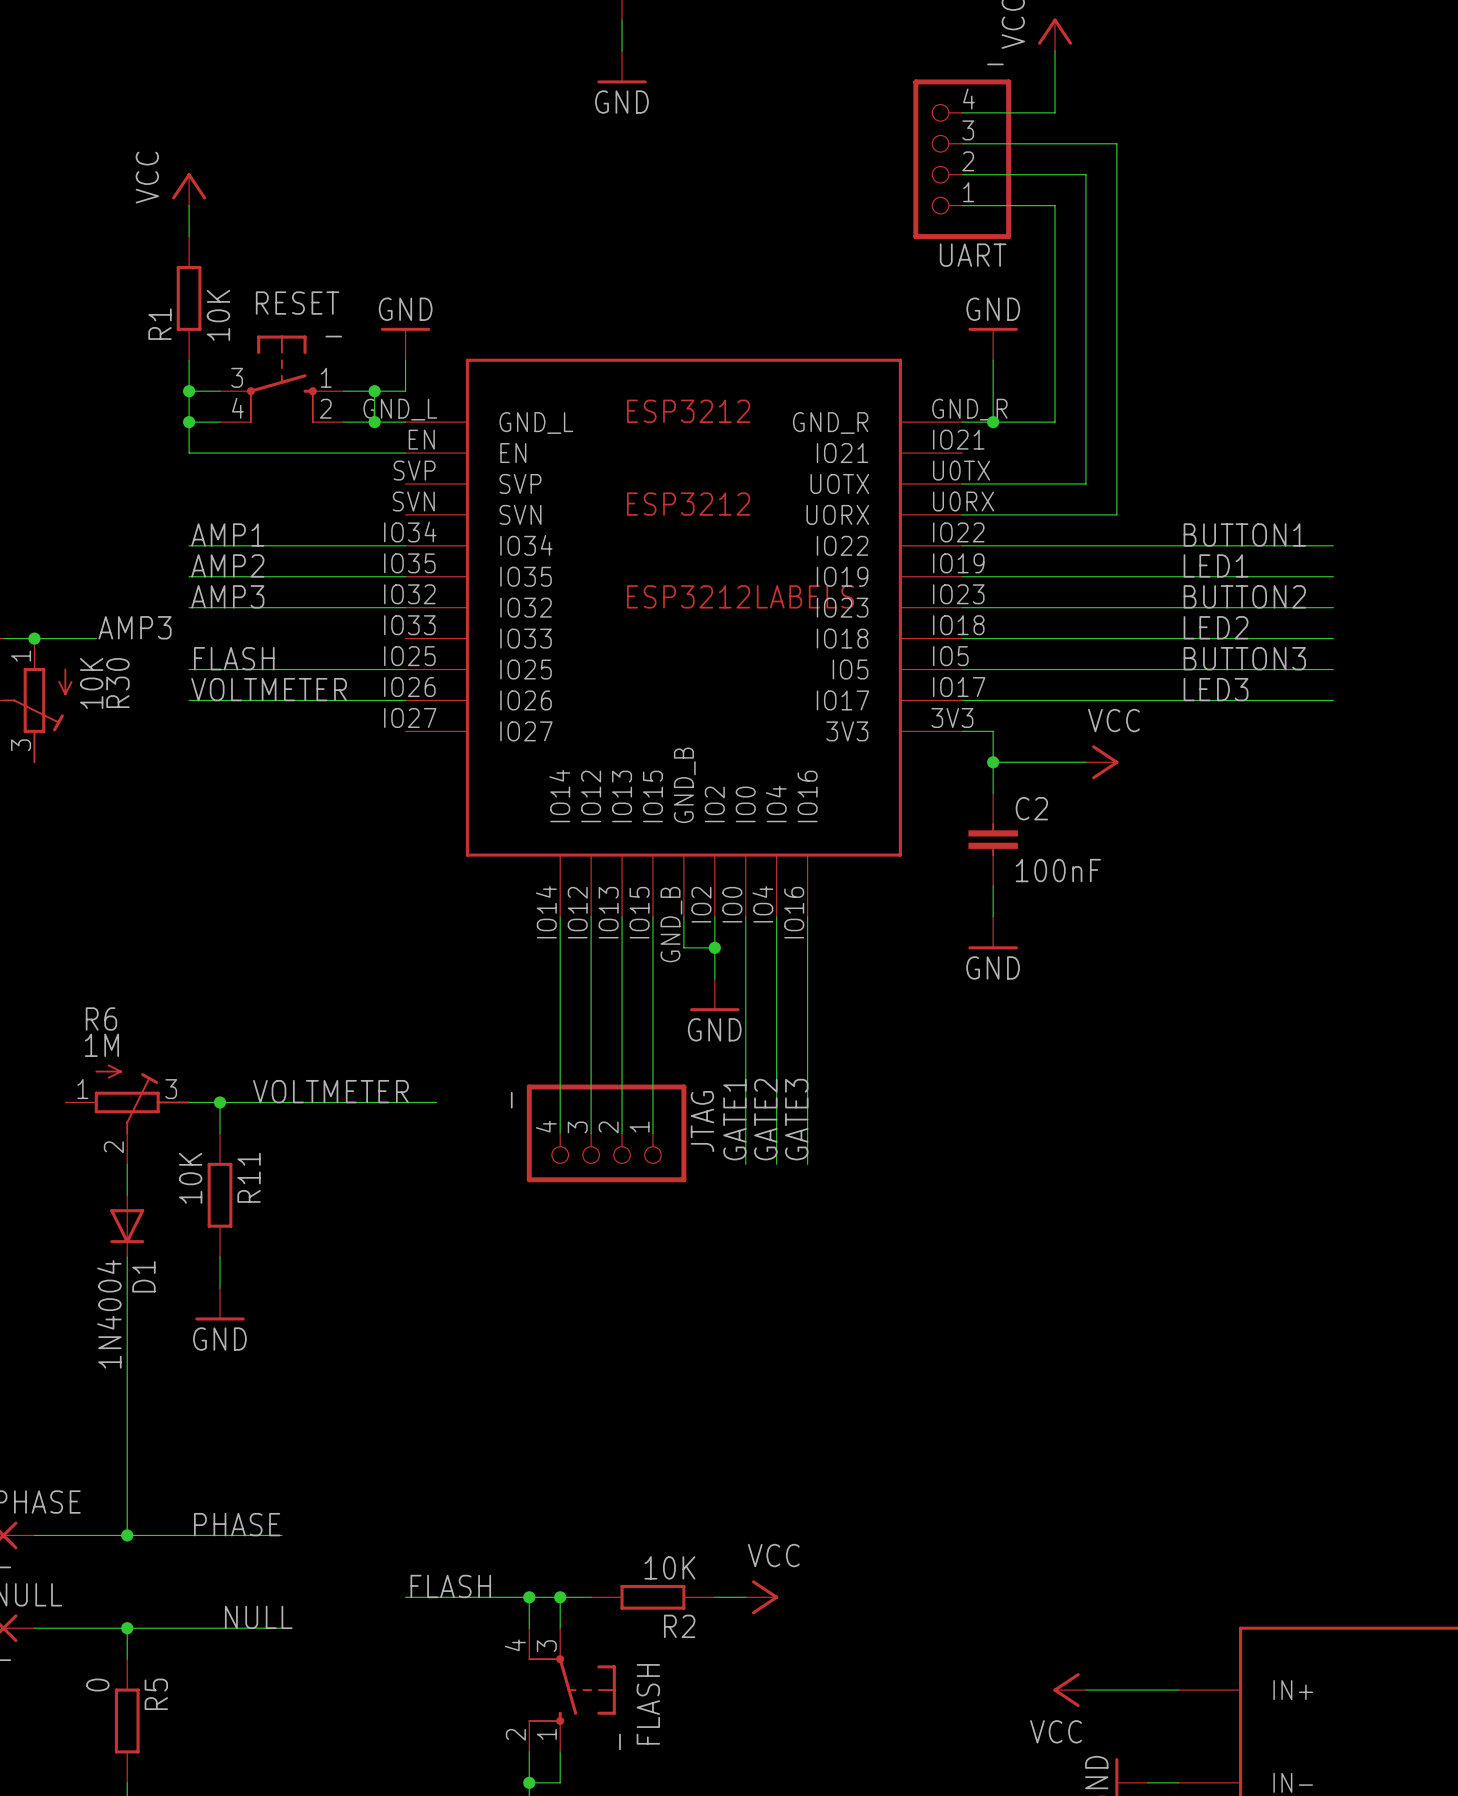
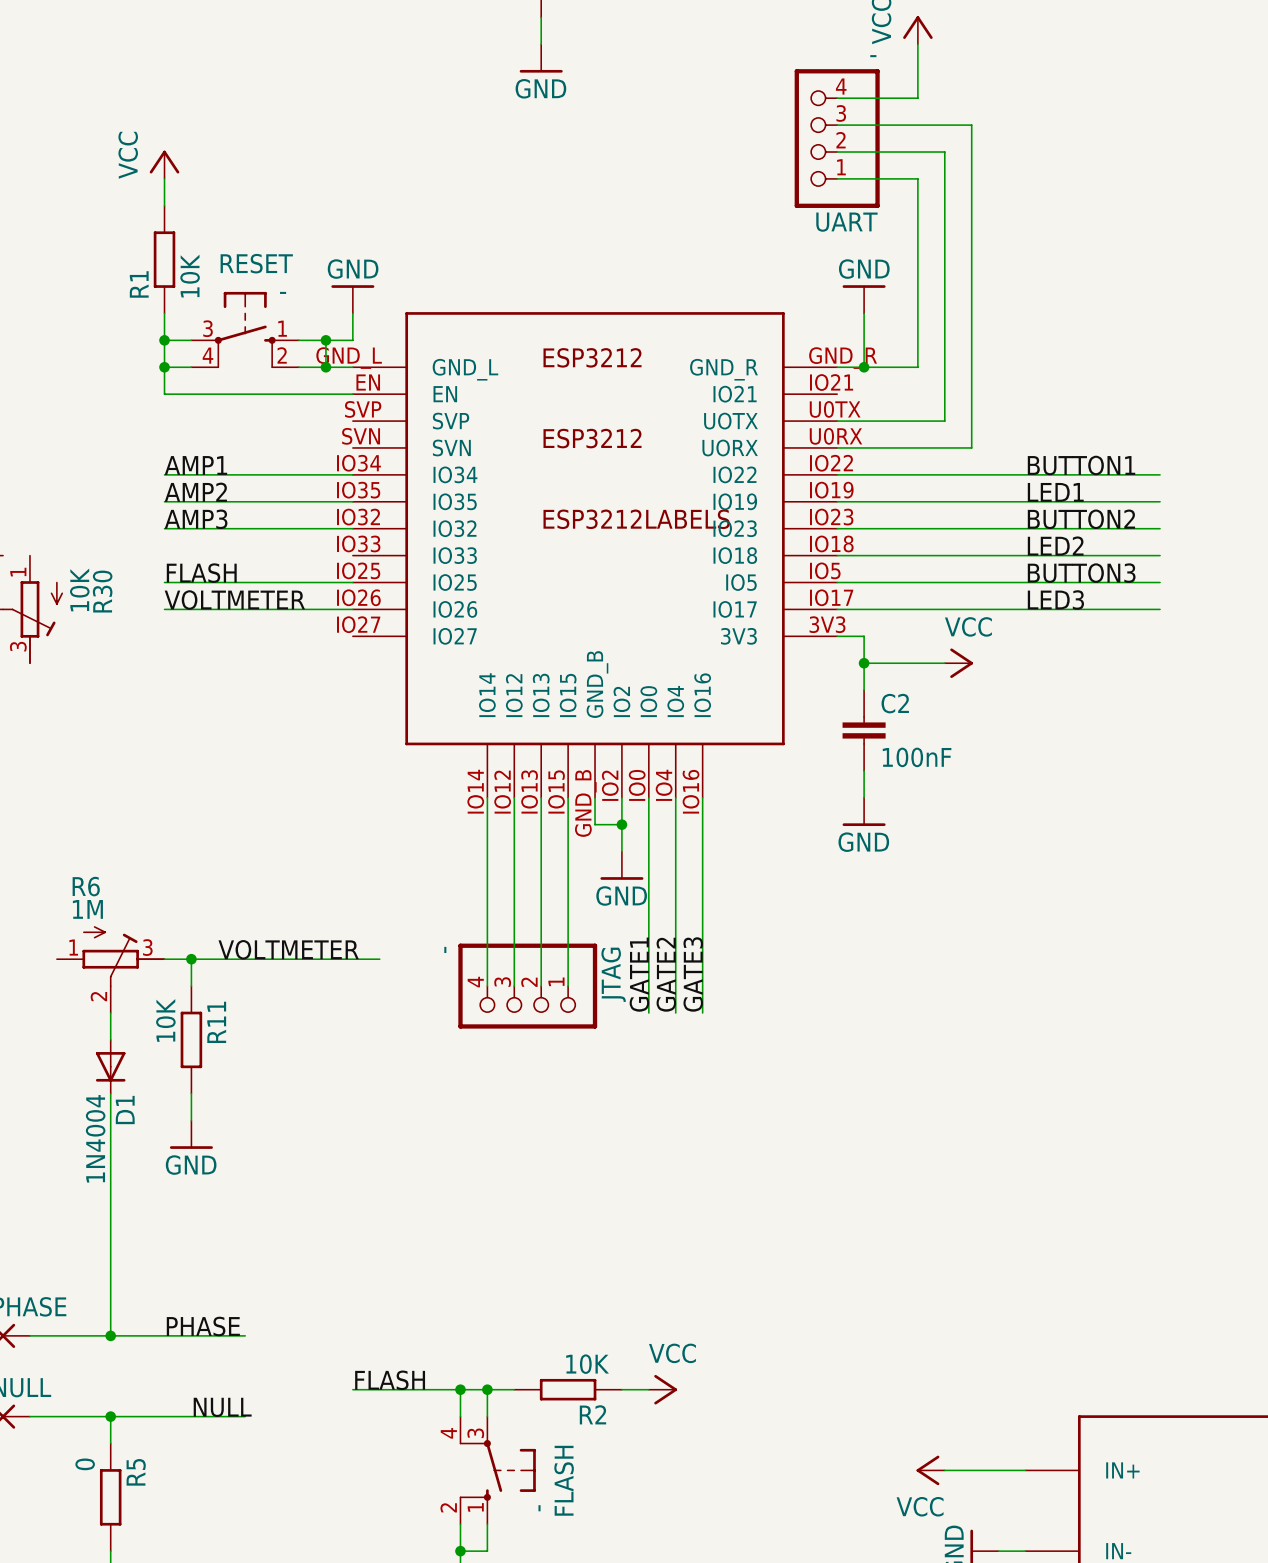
label: AMP3 (135, 627) -> none
wire: (3, 638) (96, 638) -> none
junction: (34, 638) -> none

